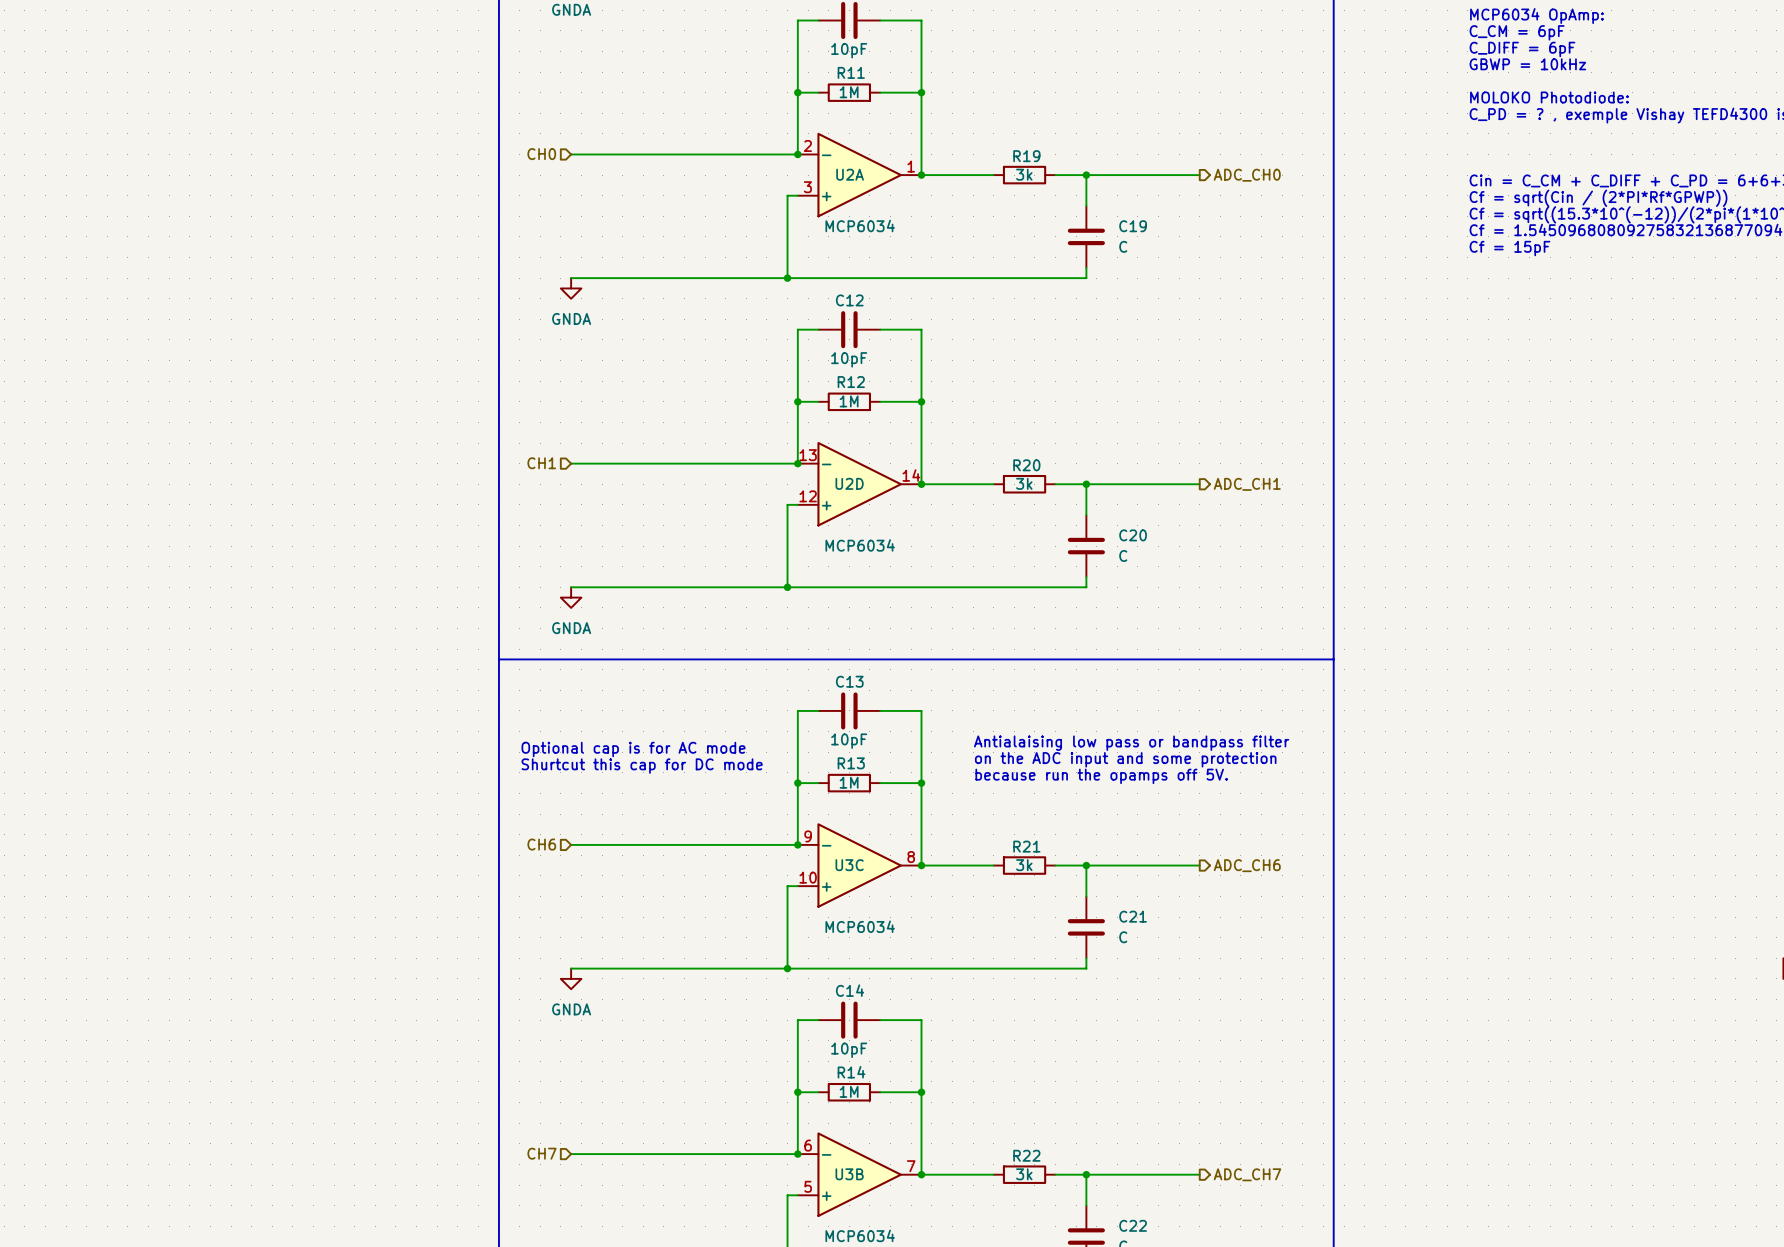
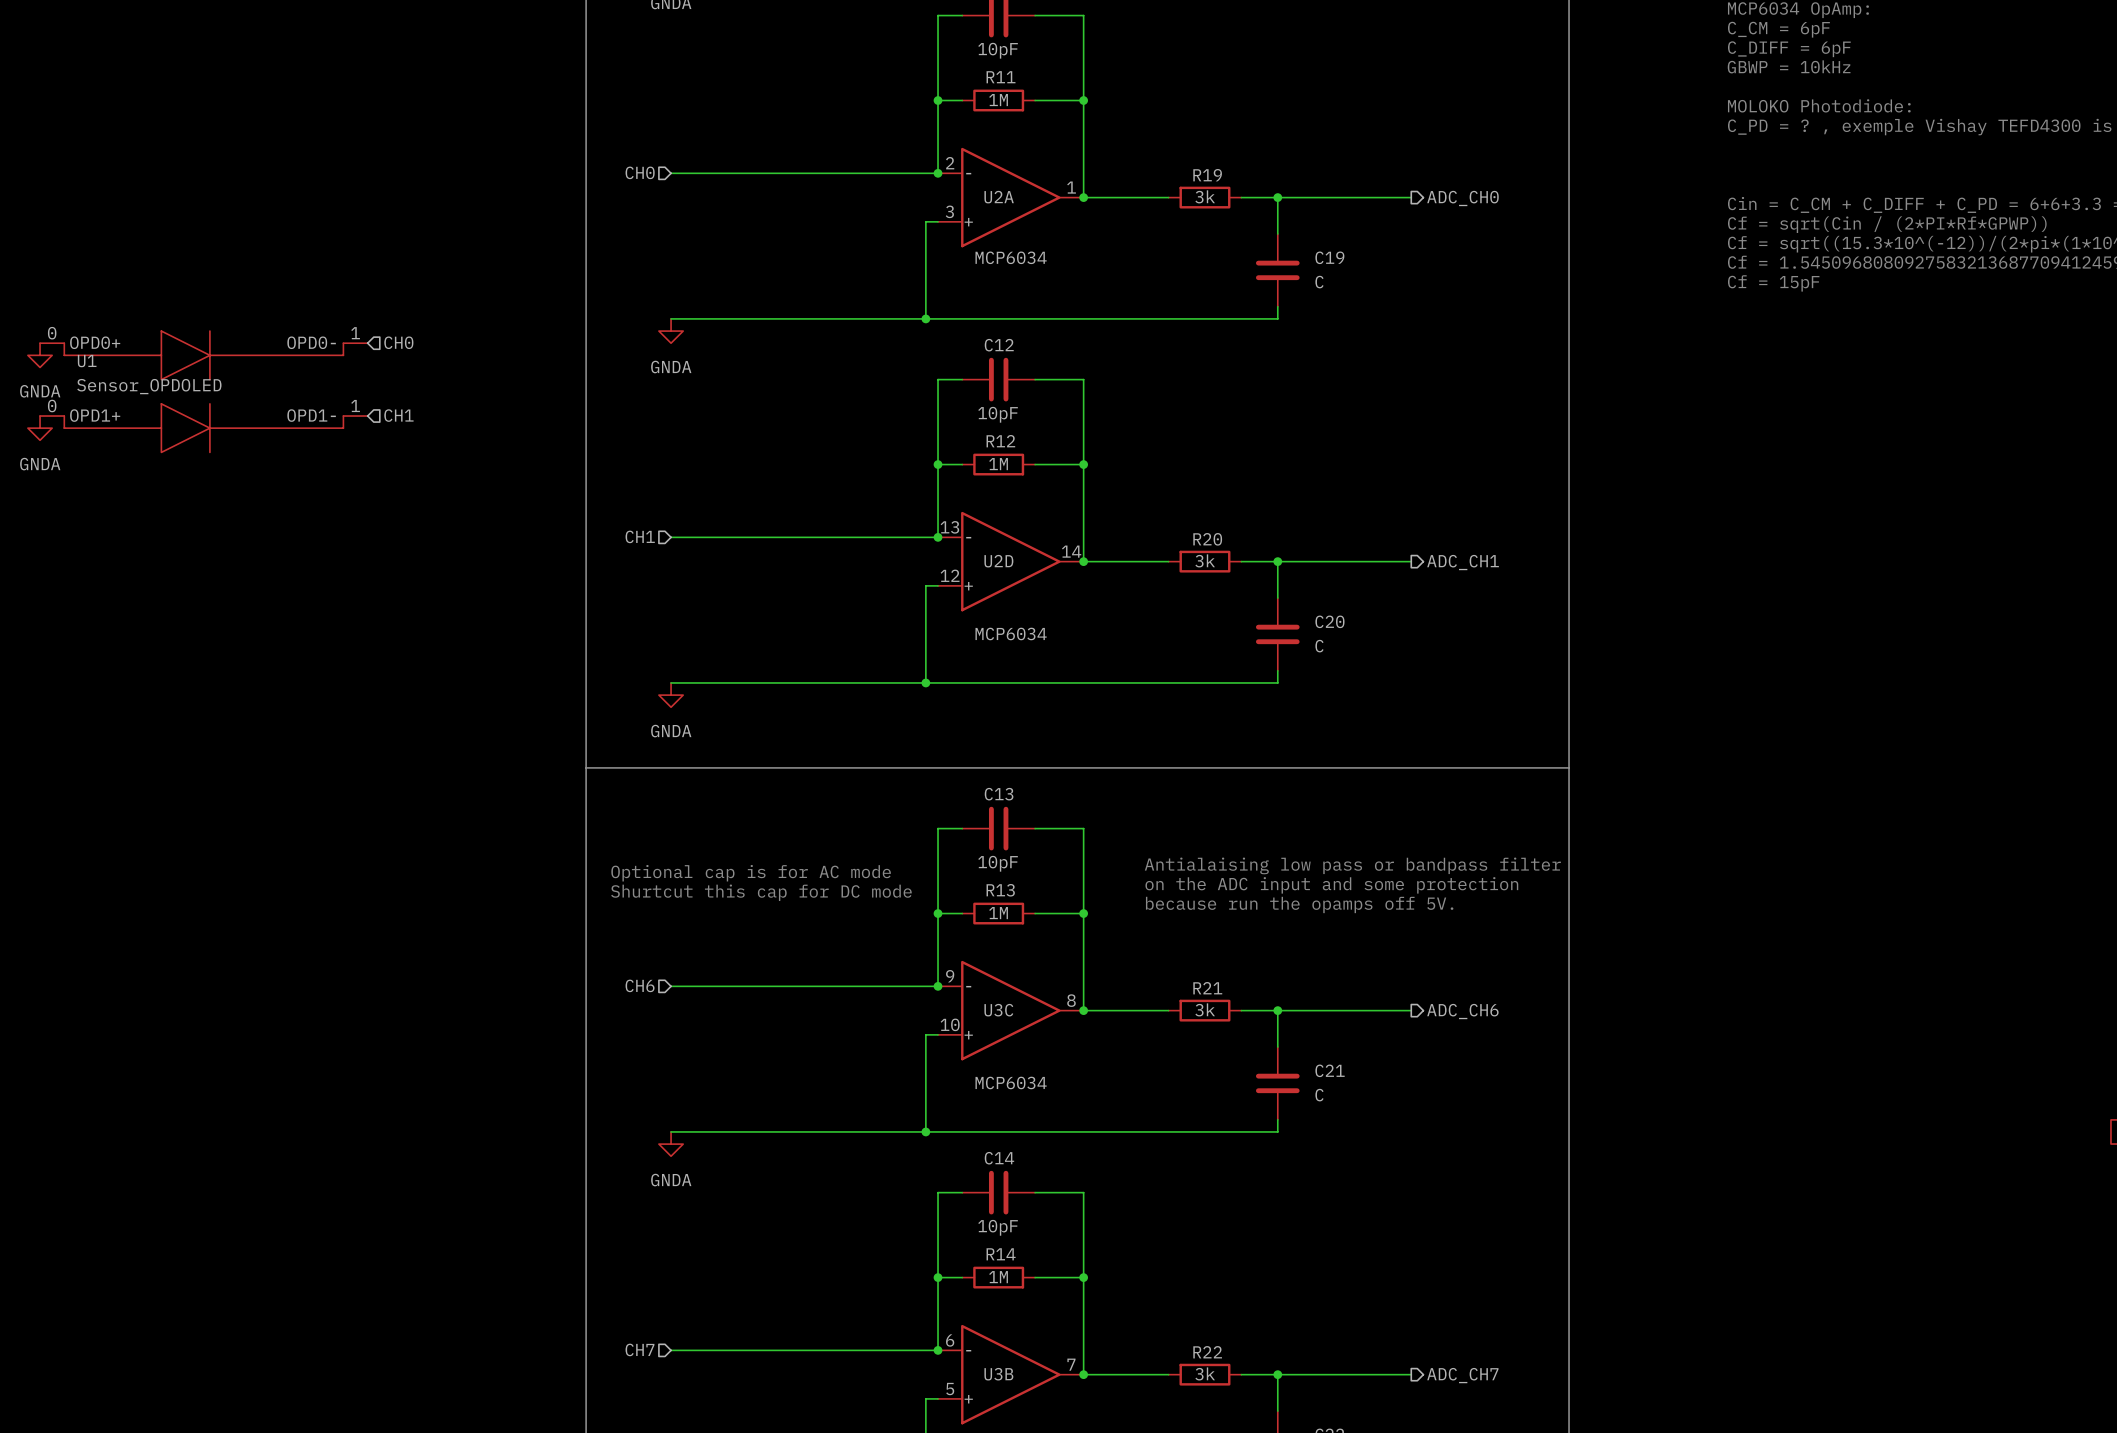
hierarchical label: none -> CH0 (398, 342)
power symbol: none -> GNDA (40, 355)
U1: none -> Sensor_OPDOLED (203, 391)
hierarchical label: none -> CH1 (398, 415)
power symbol: none -> GNDA (40, 428)

